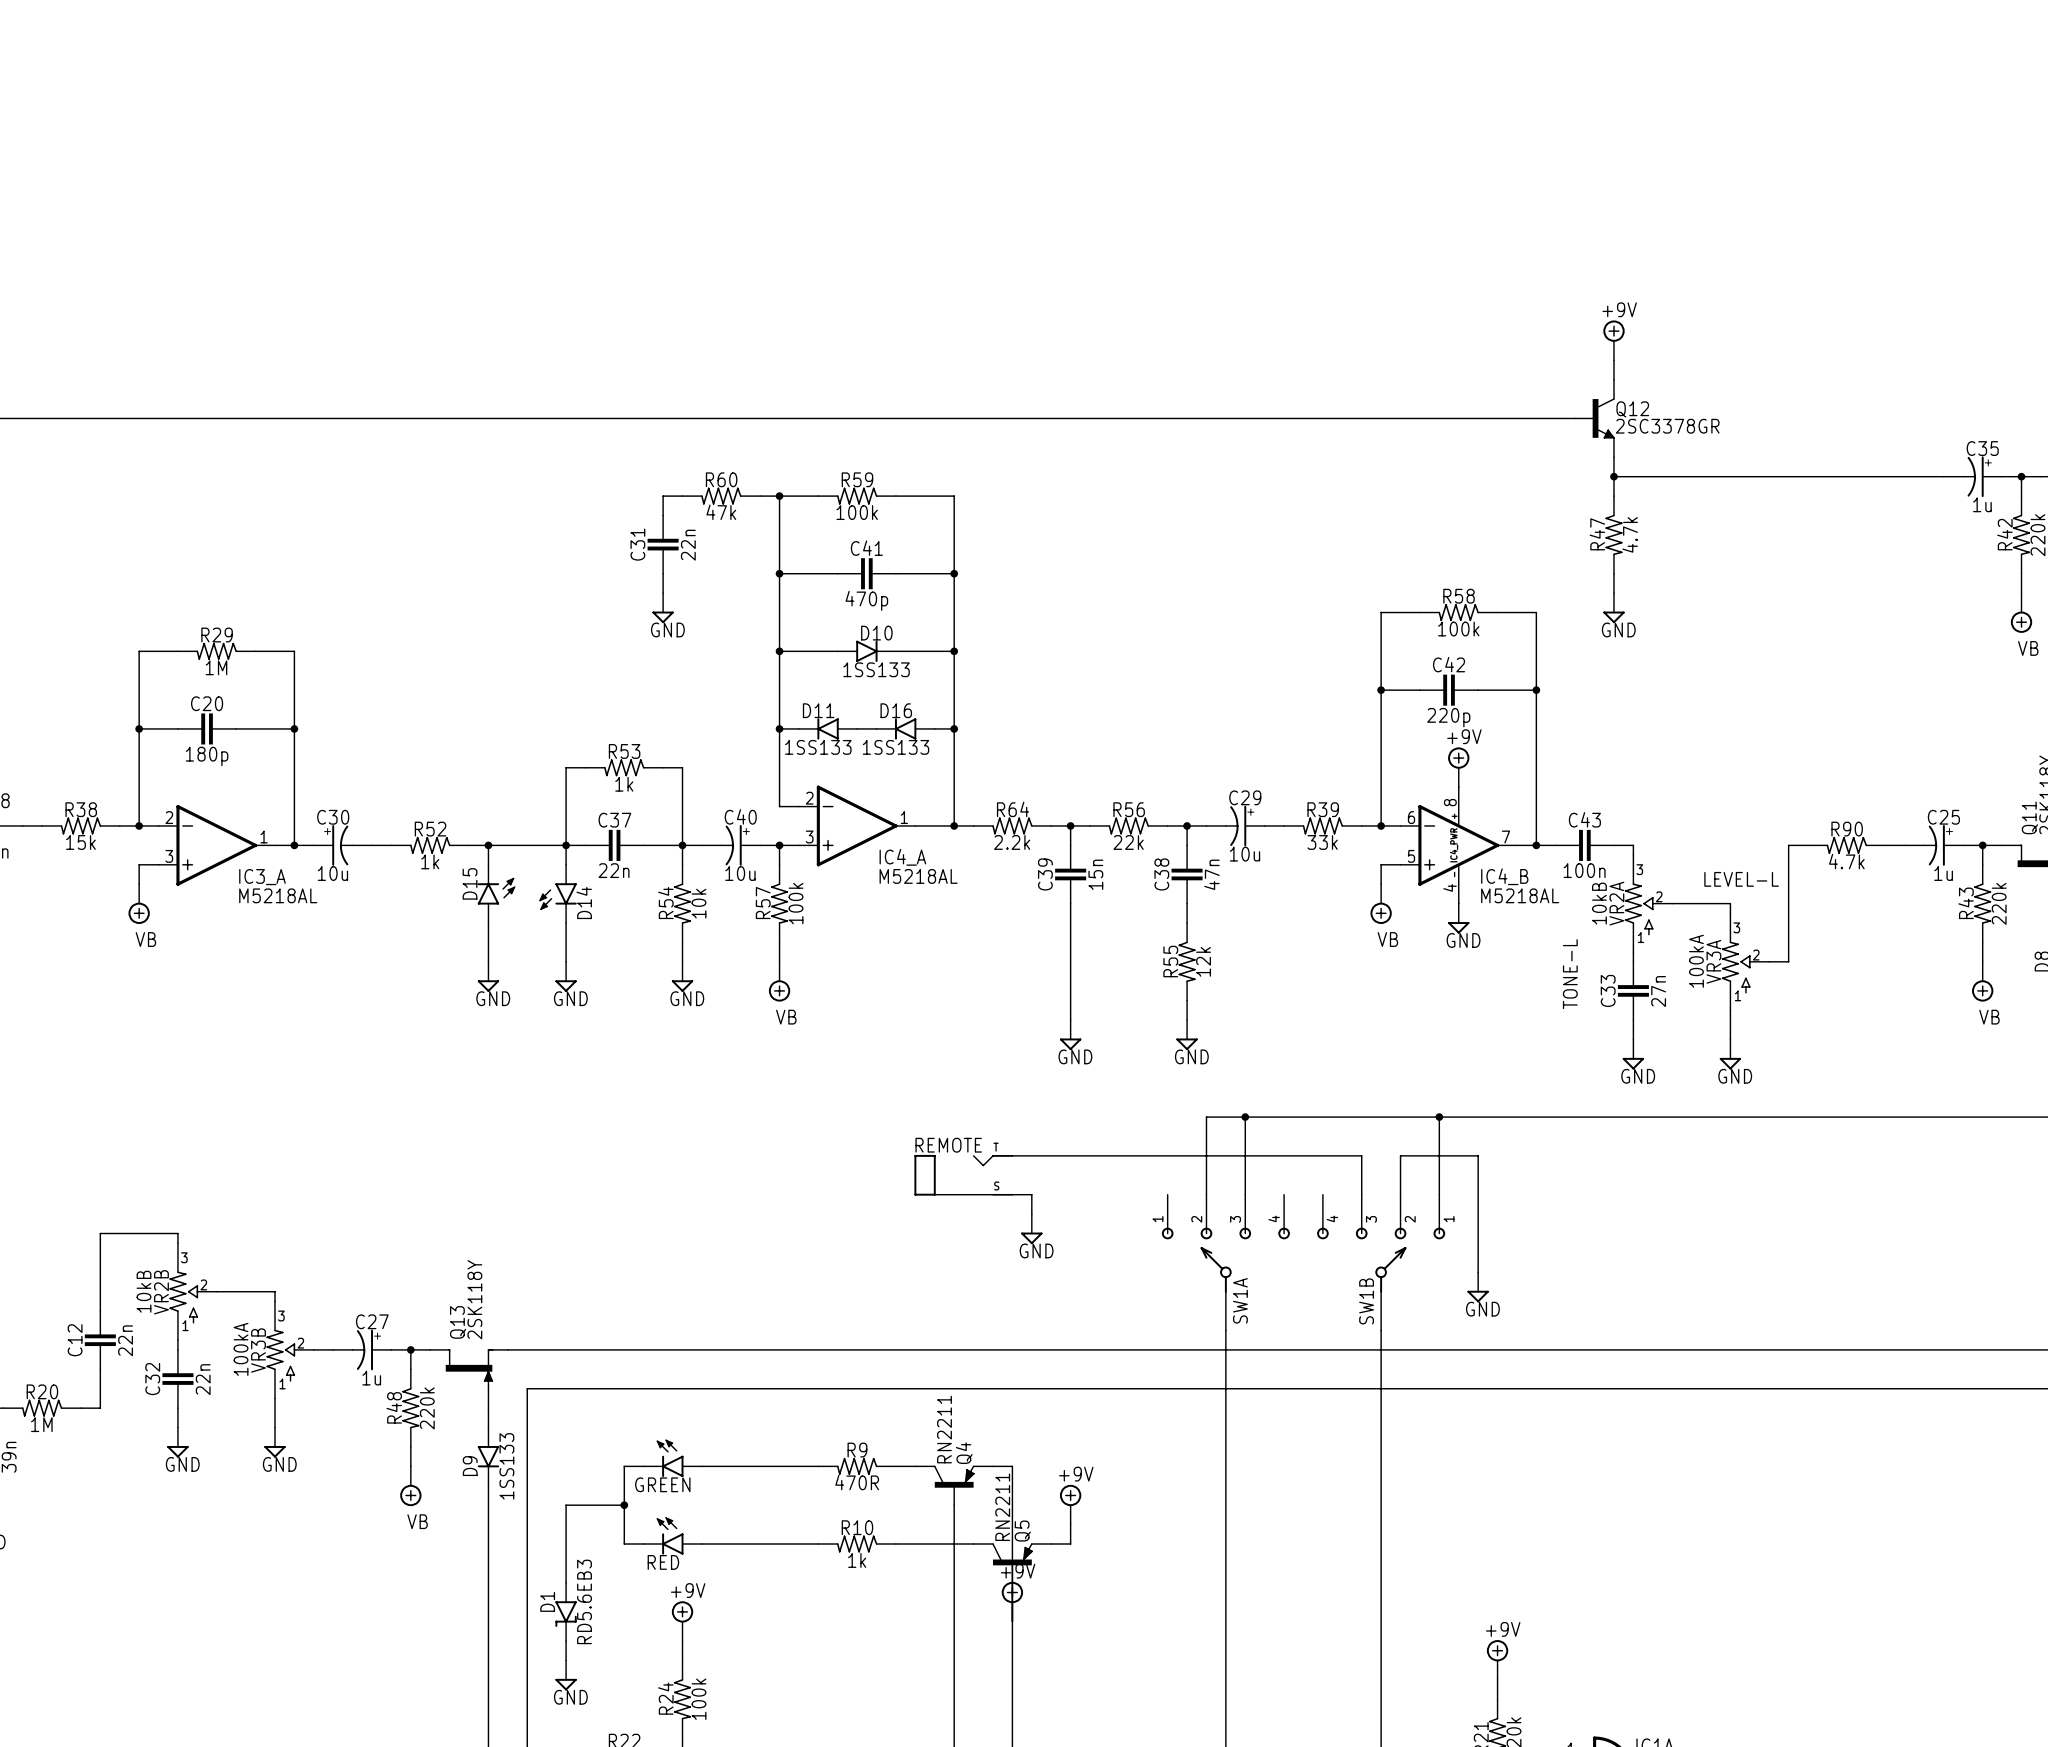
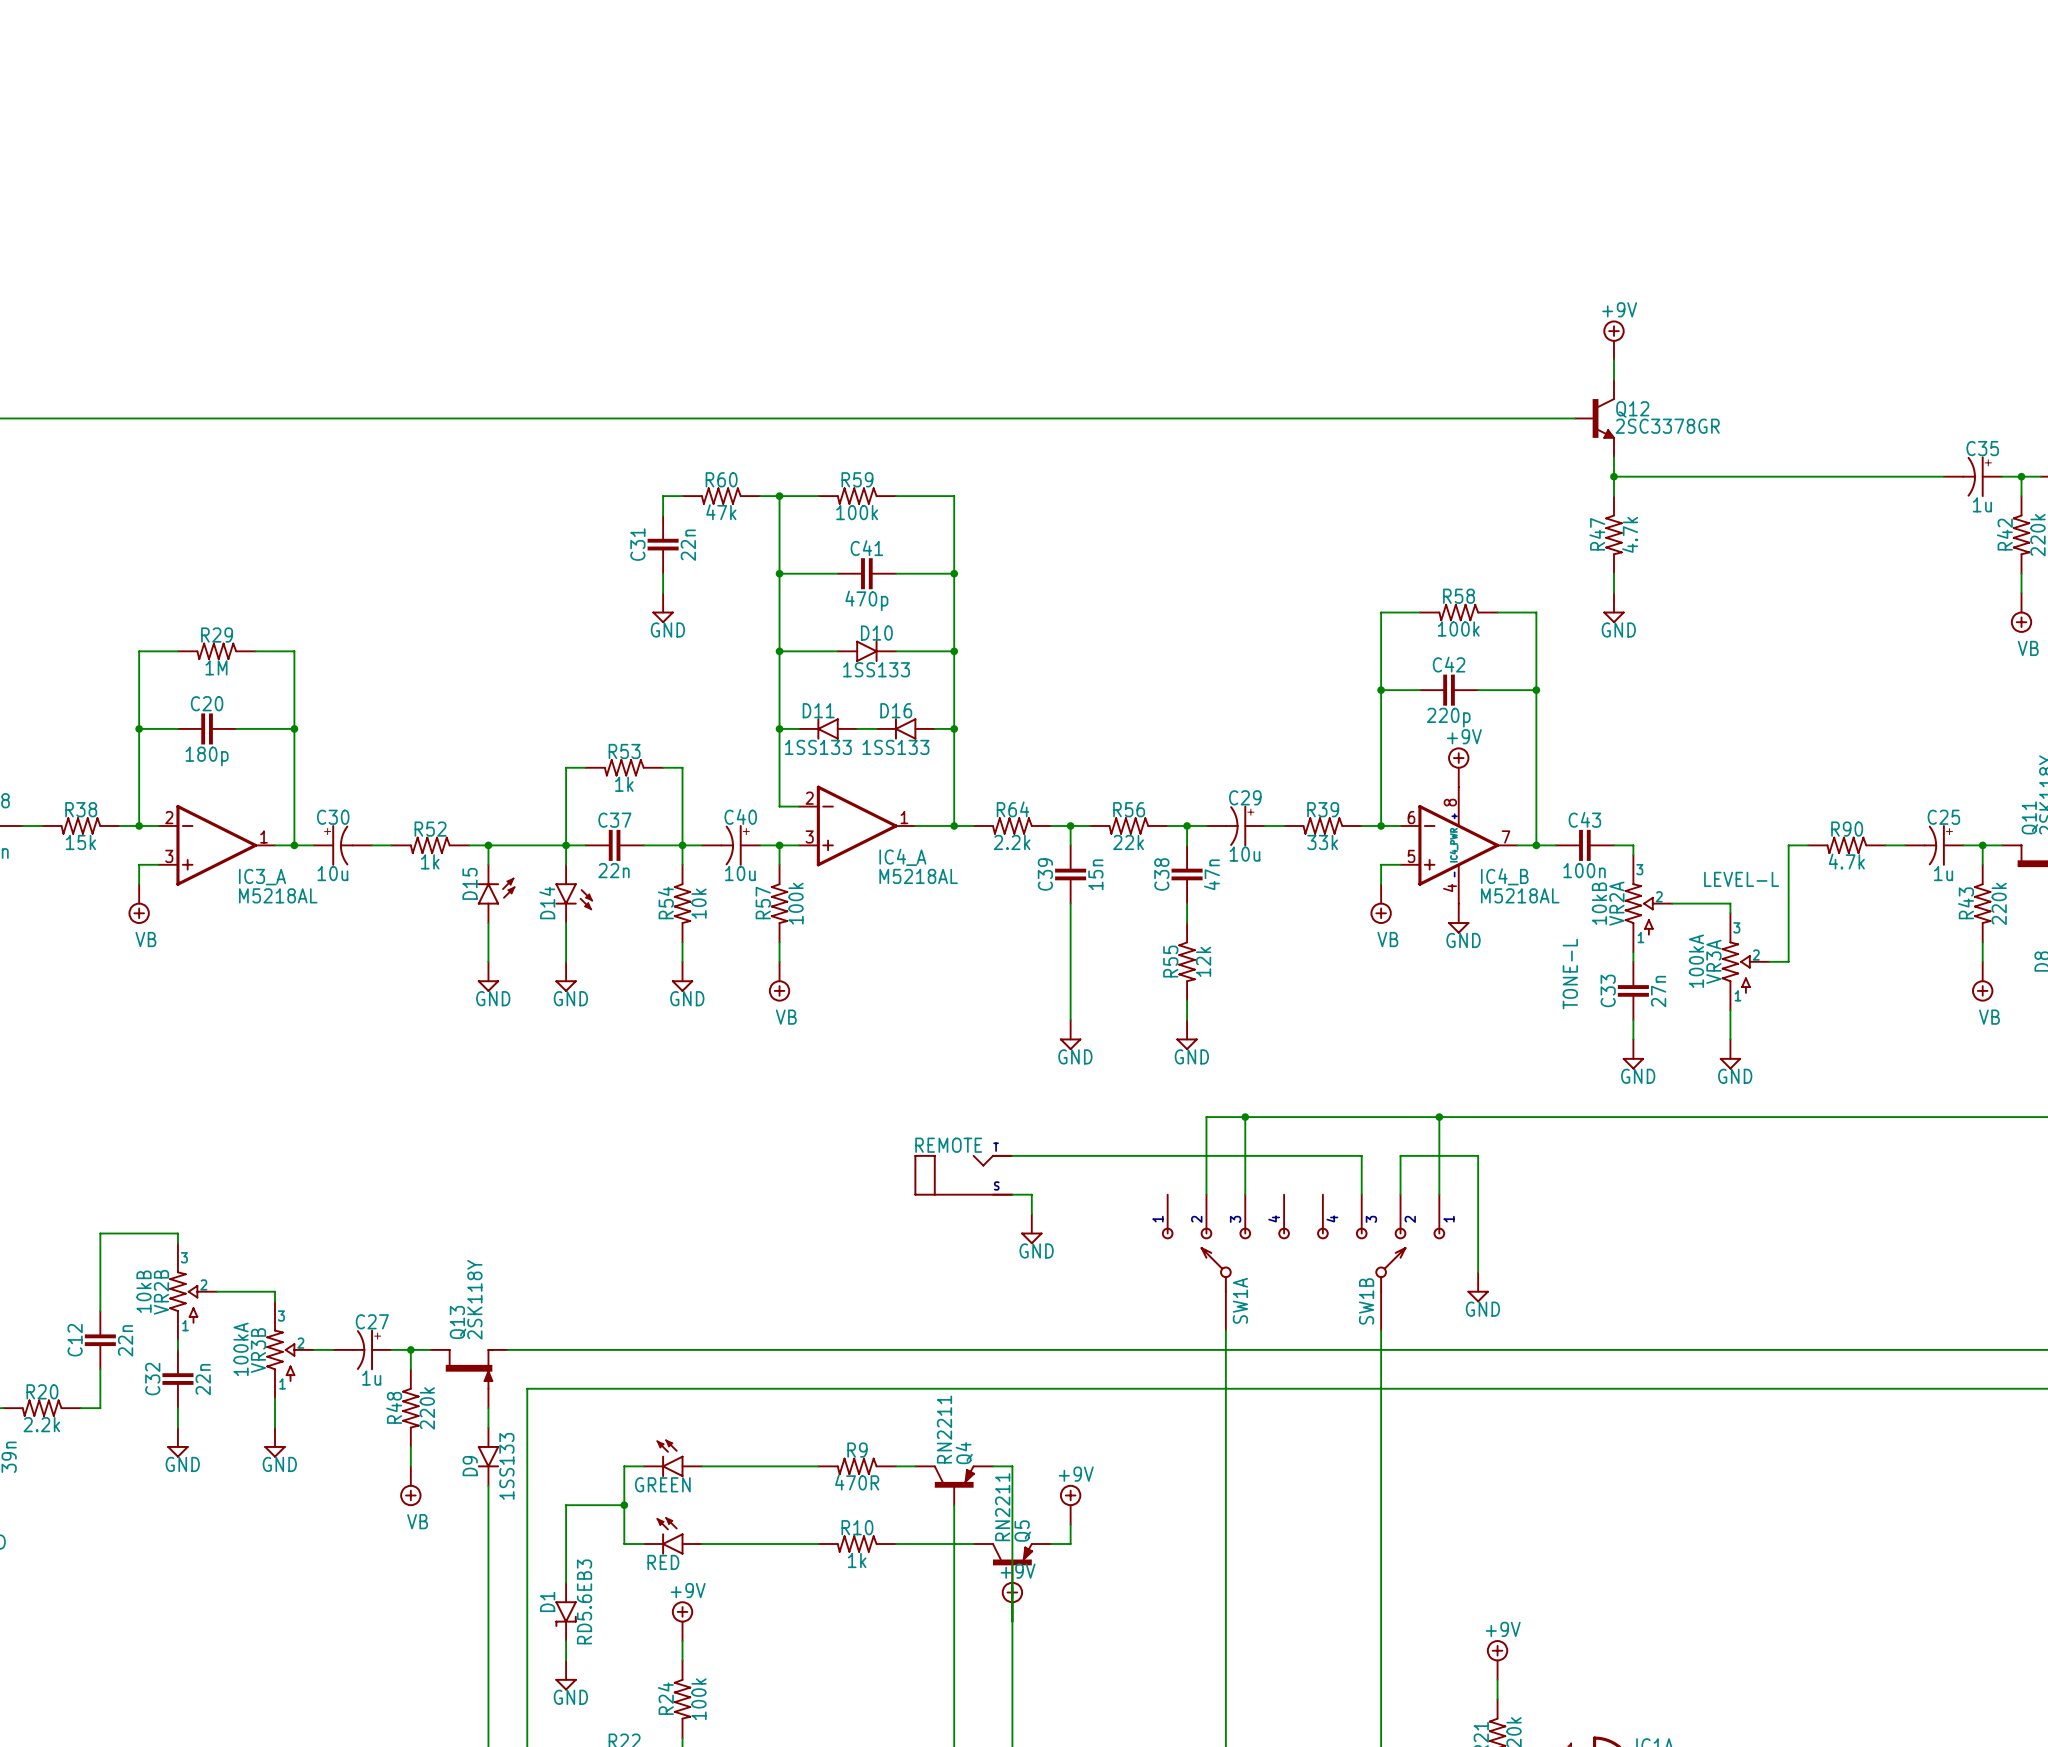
D14 flip: as is (558, 896) -> left-right (574, 896)
R20 value: 1M (41, 1424) -> 2.2k (41, 1424)

